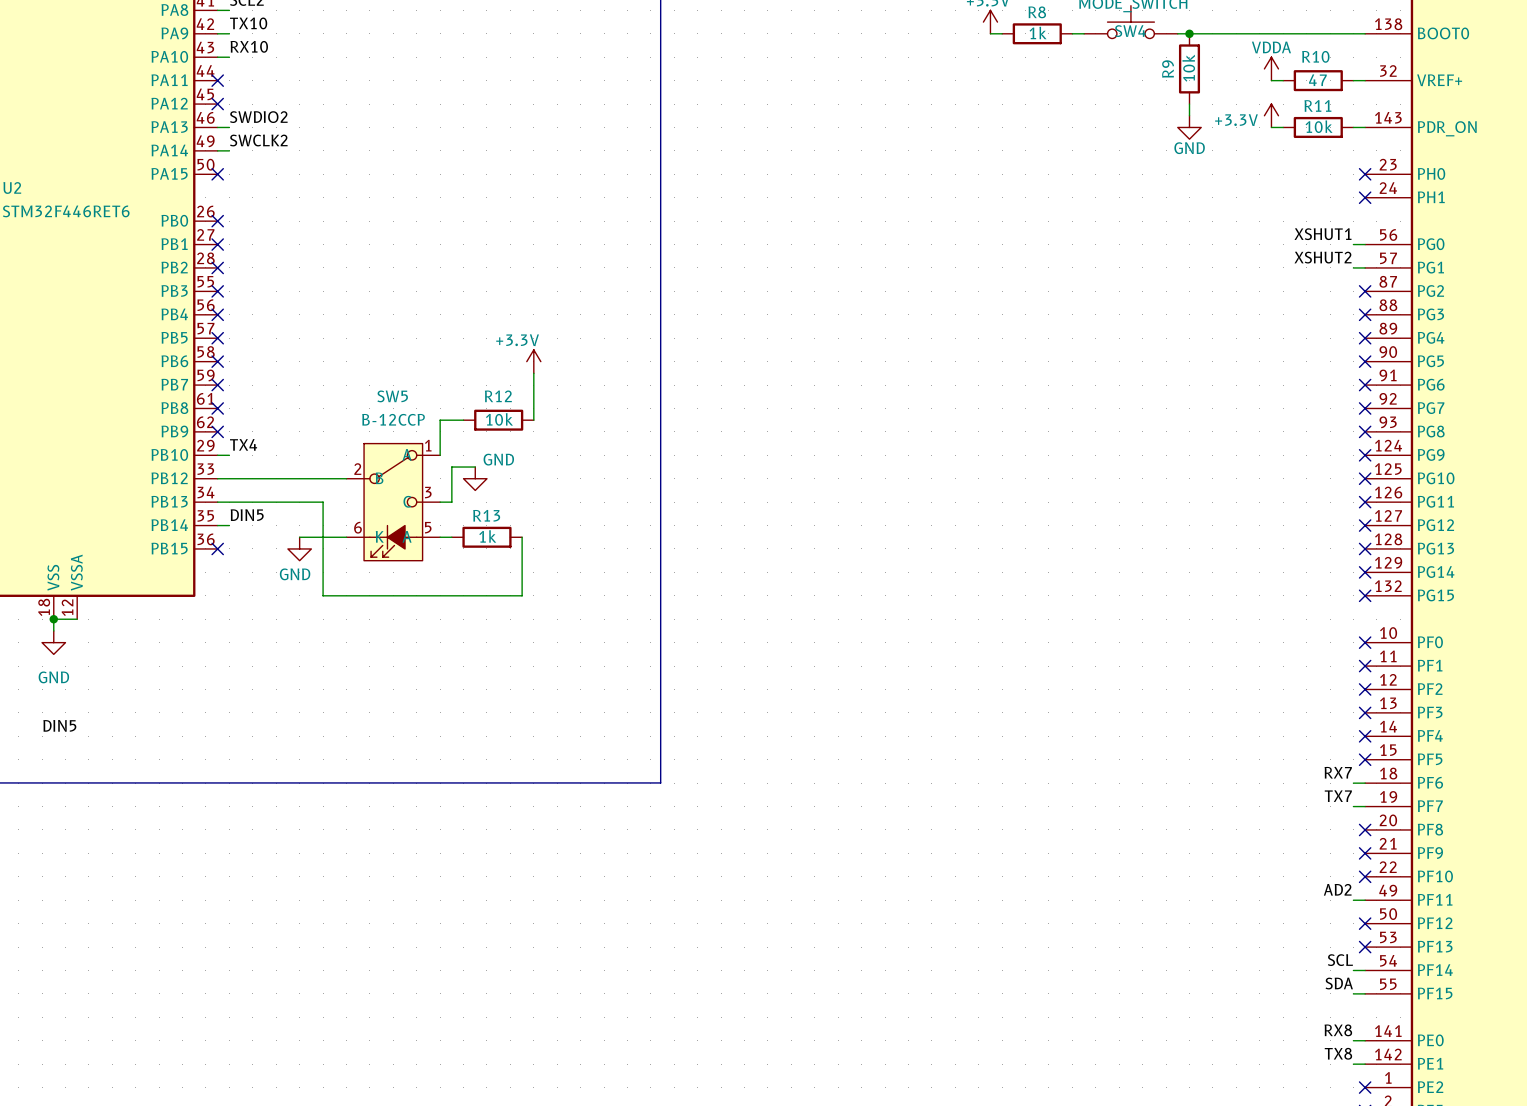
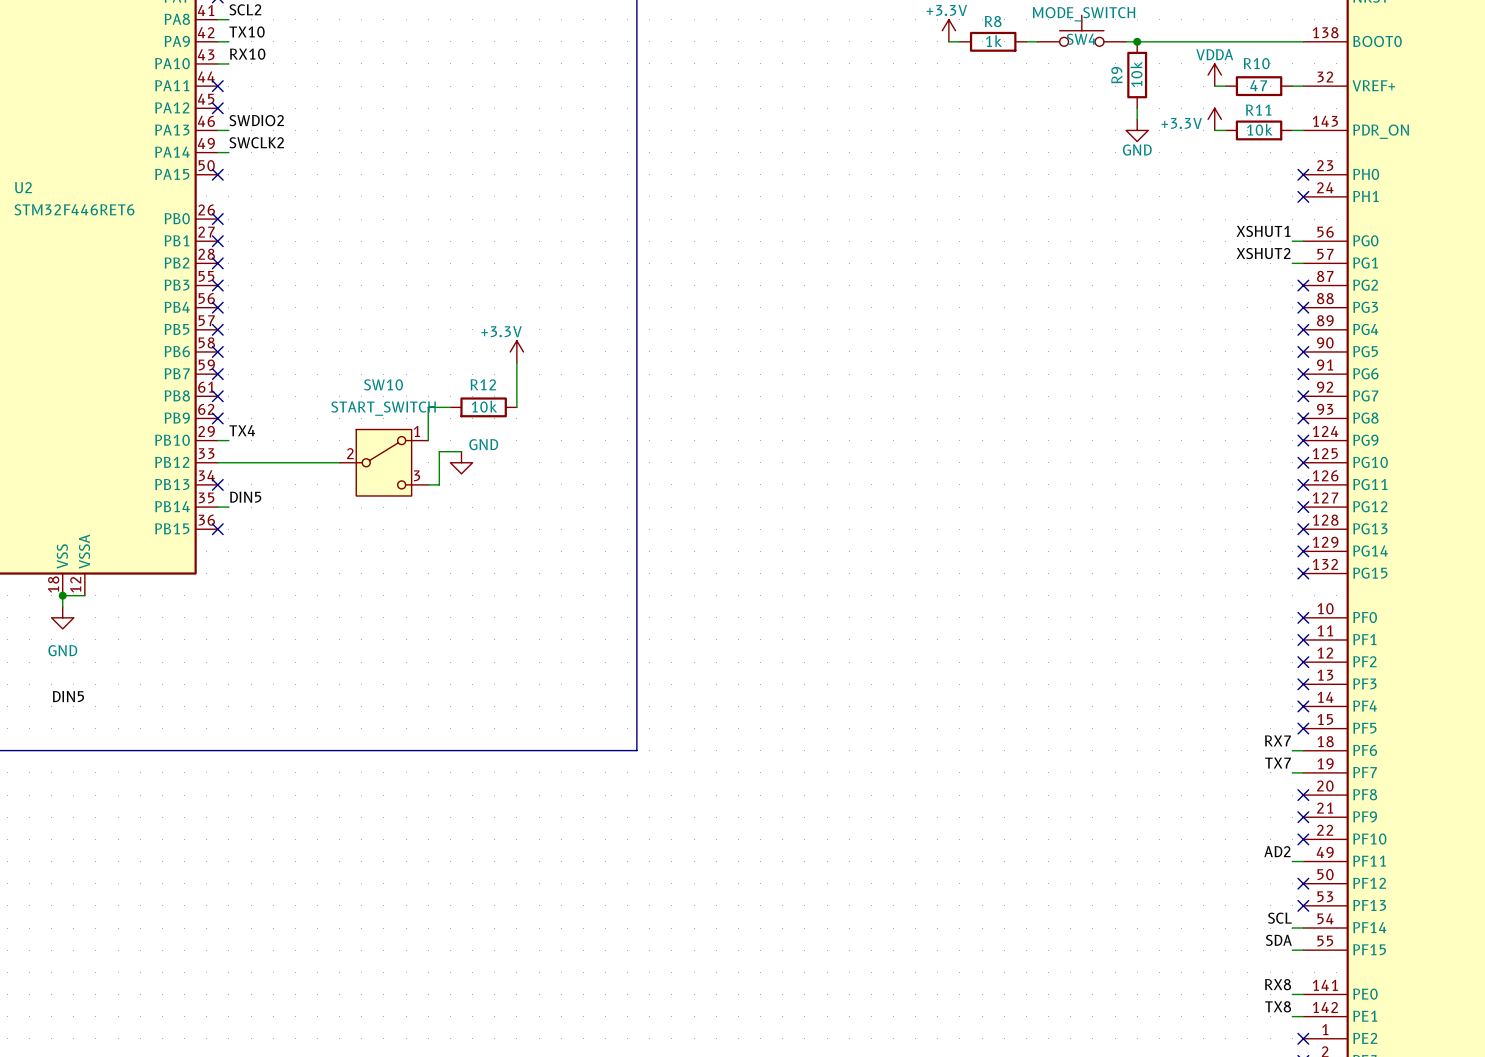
SW10: none -> START_SWITCH (383, 462)
wire: (217, 502) (323, 502) (323, 595) (522, 595) (522, 537) -> none
no-connect mark: none -> (217, 484)
SW5: B-12CCP (393, 502) -> none
wire: (299, 537) (346, 537) -> none
wire: (440, 537) (451, 537) -> none
R13: 1k (486, 537) -> none
power symbol: GND (299, 548) -> none

